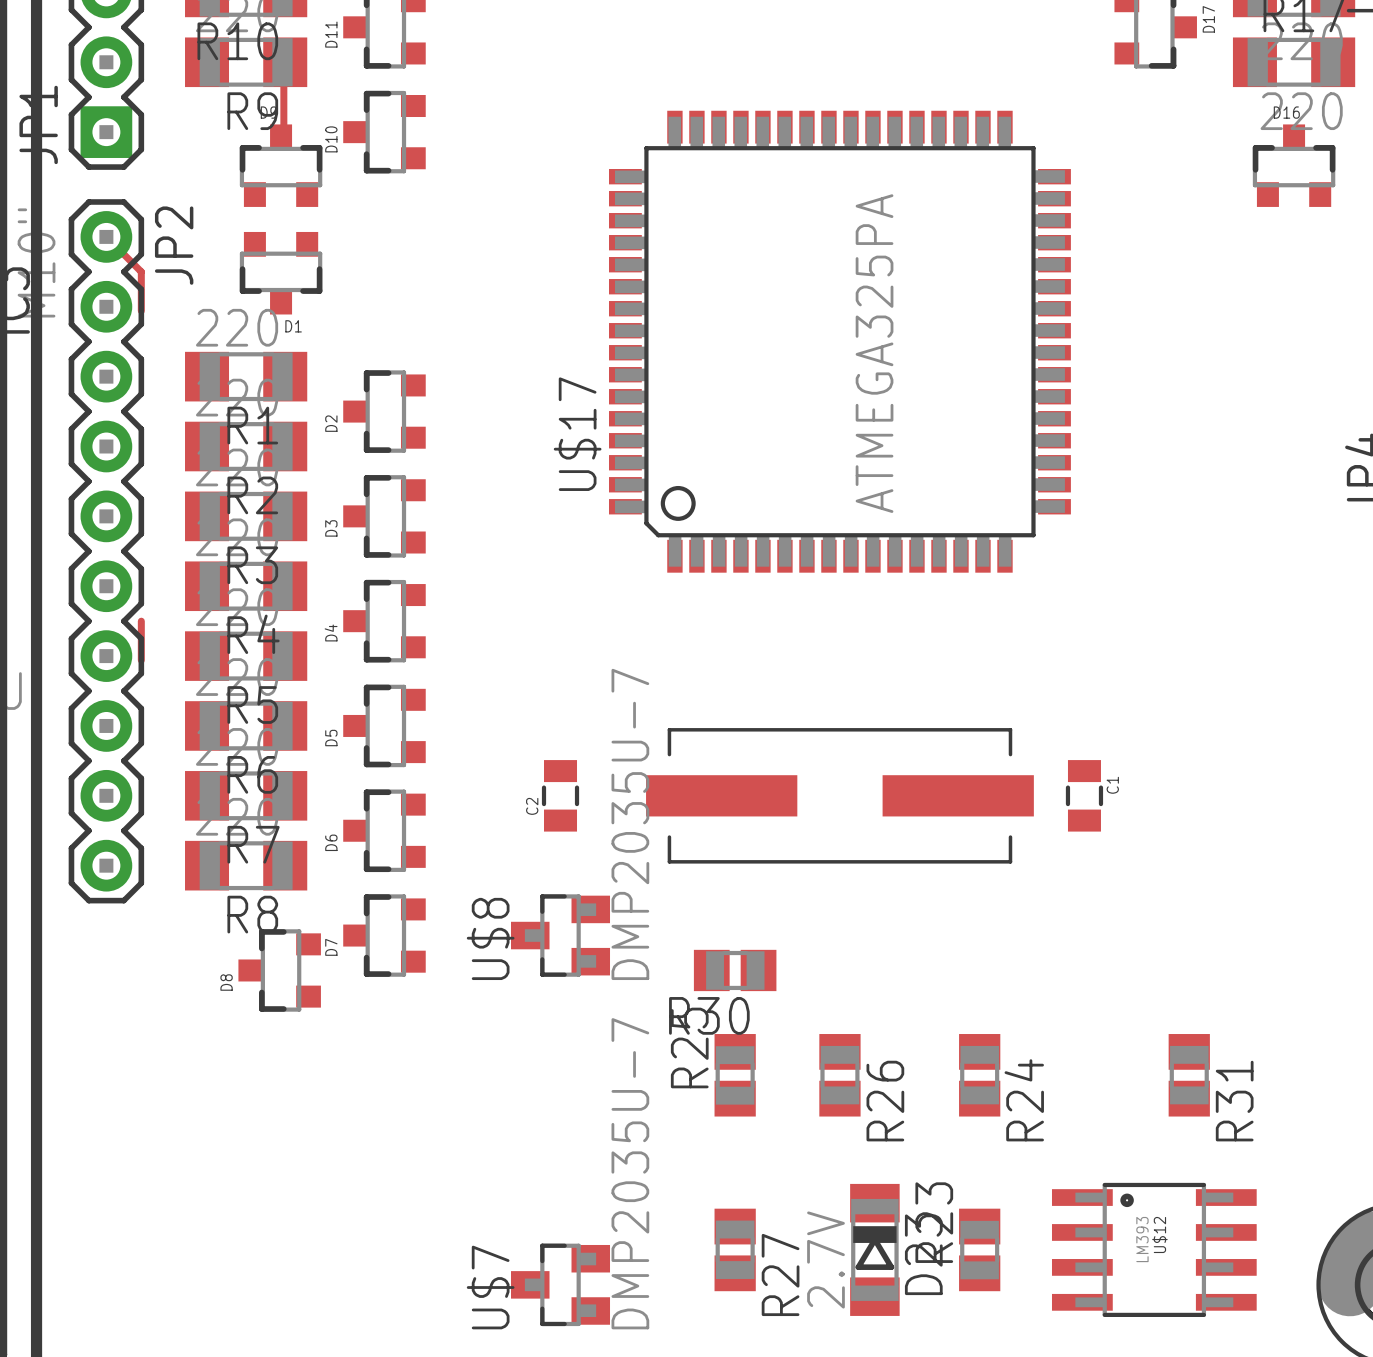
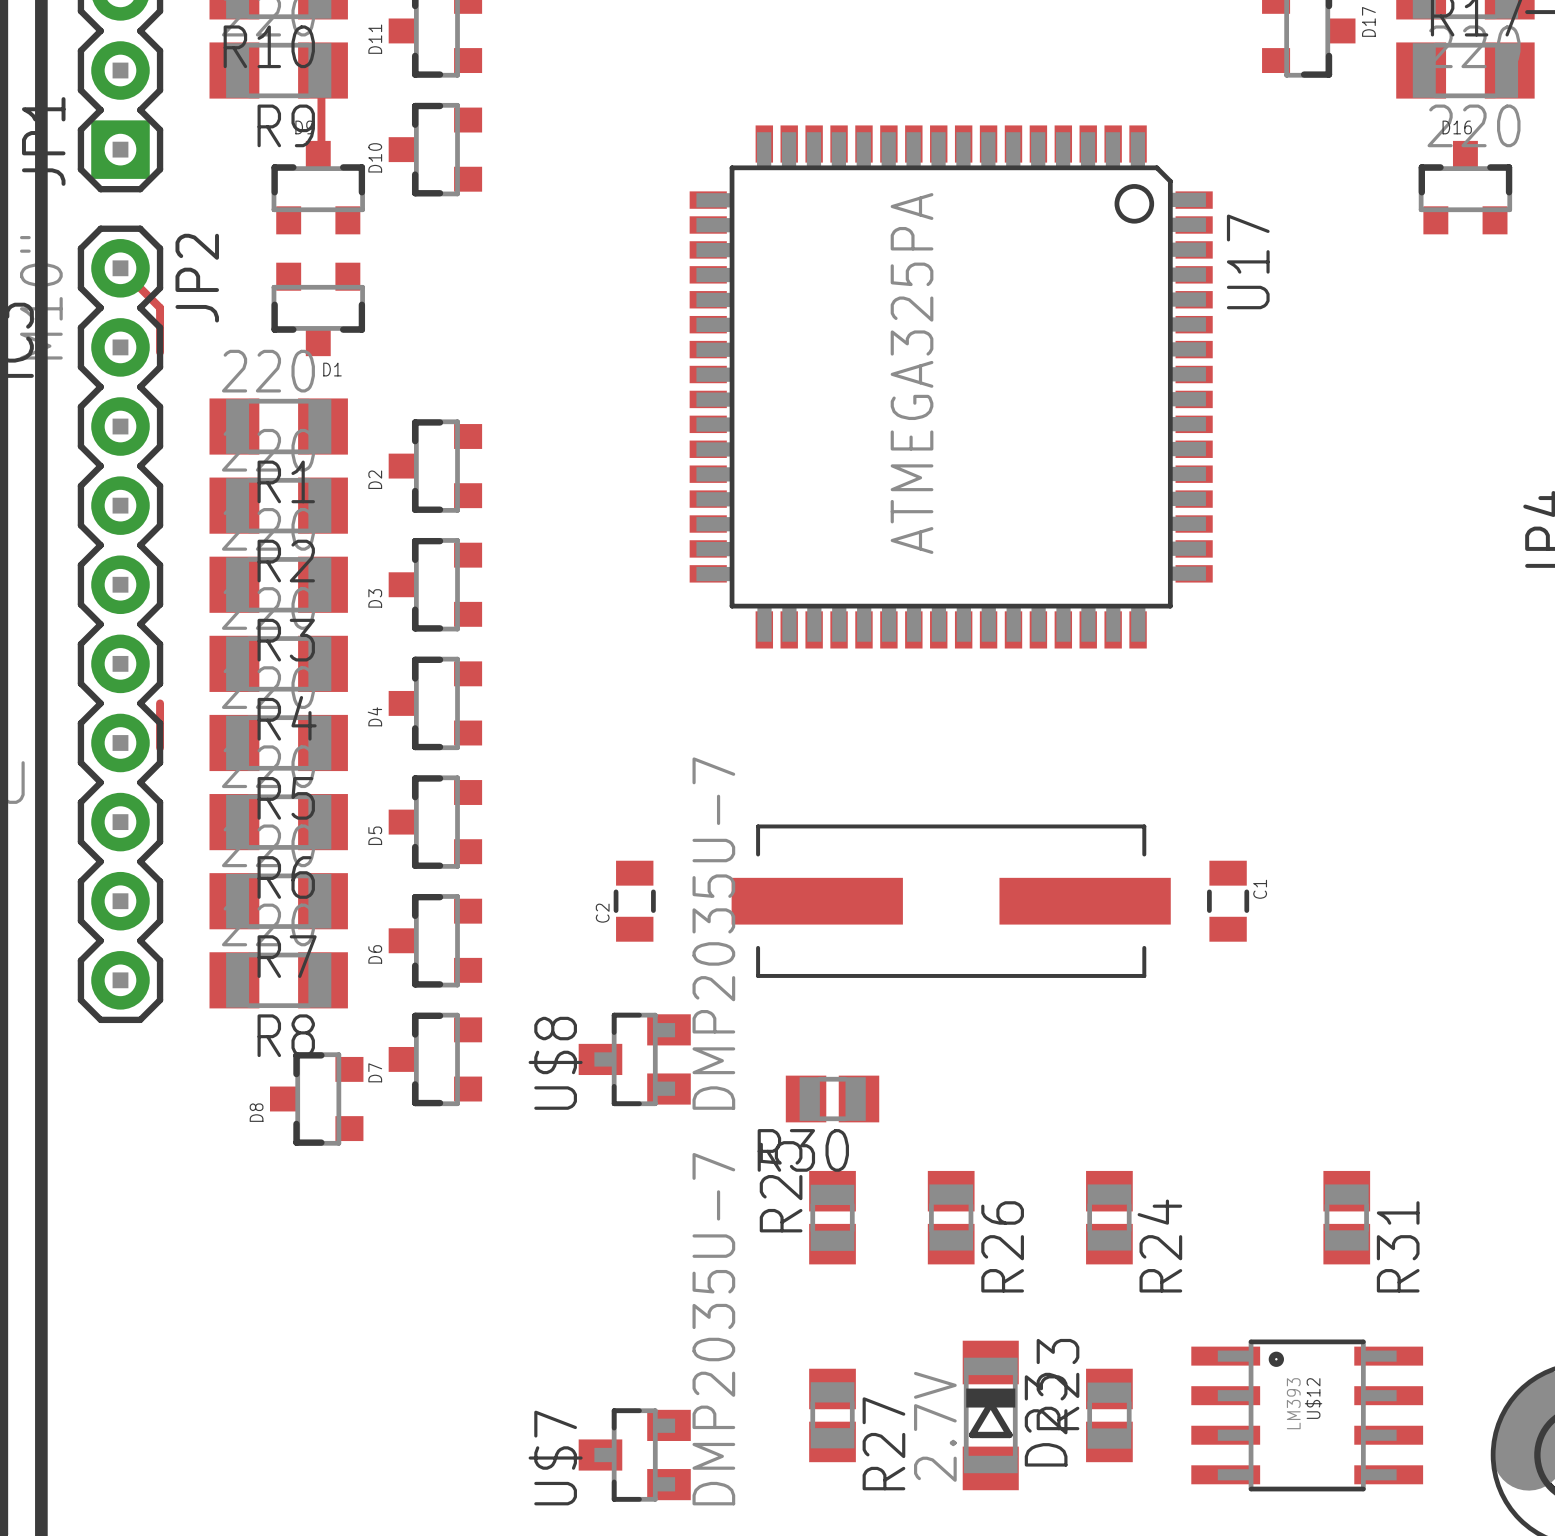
U$17: ATMEGA325PA (839, 341) -> none
U17: none -> ATMEGA325PA (951, 386)

